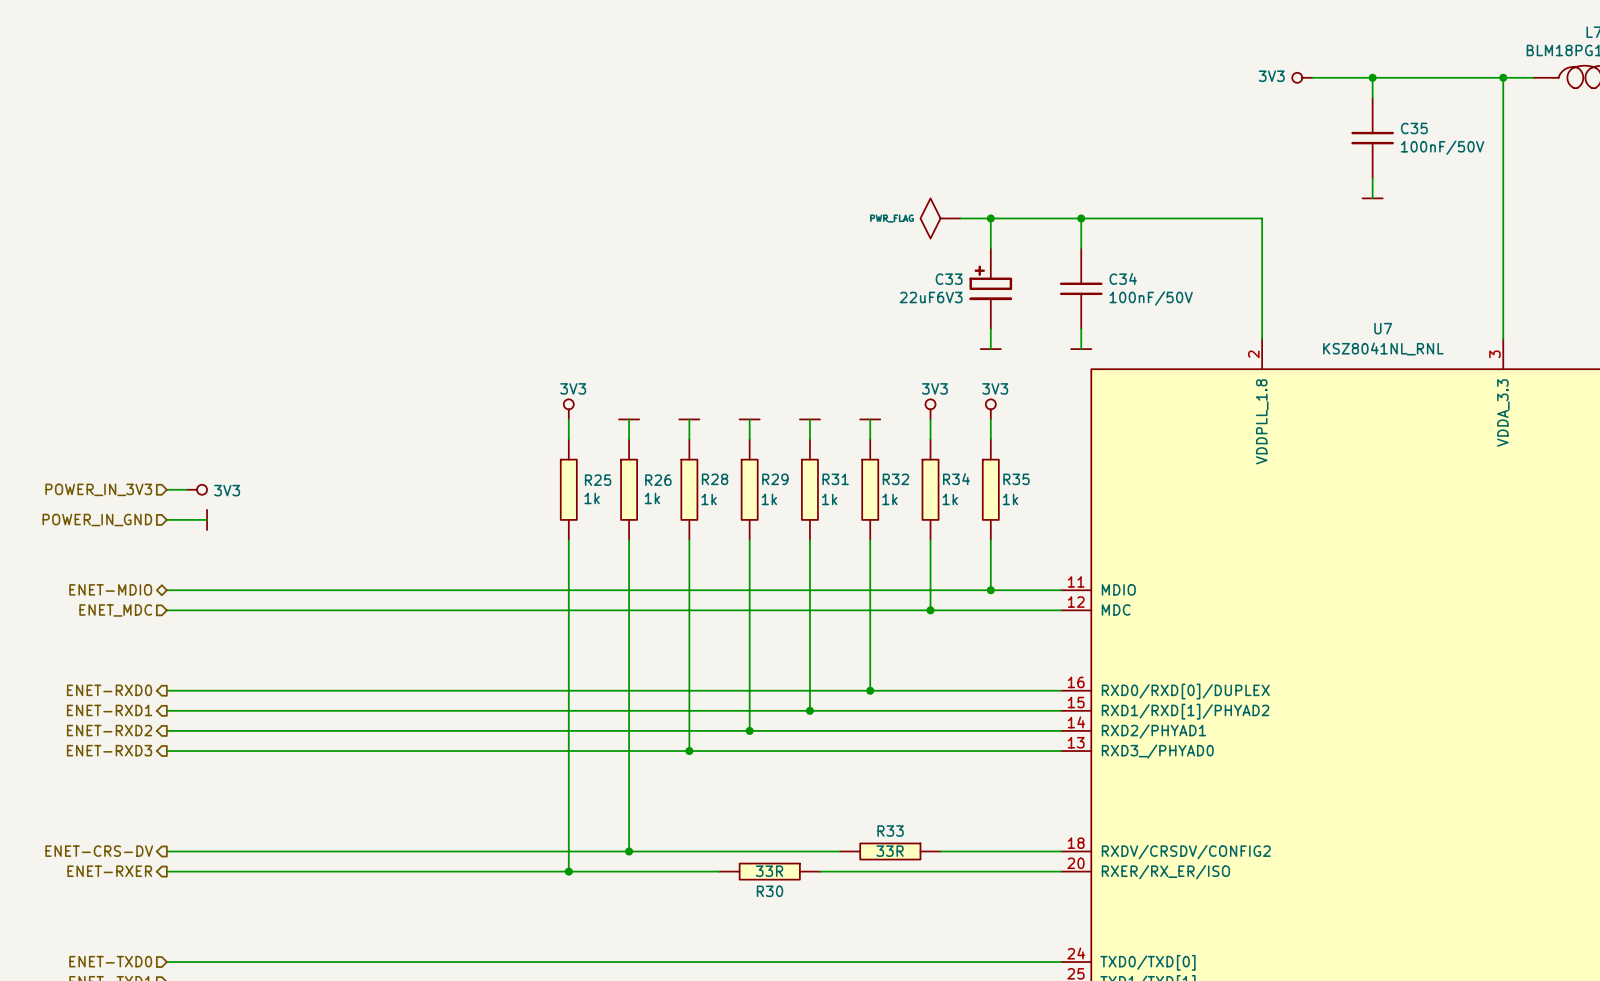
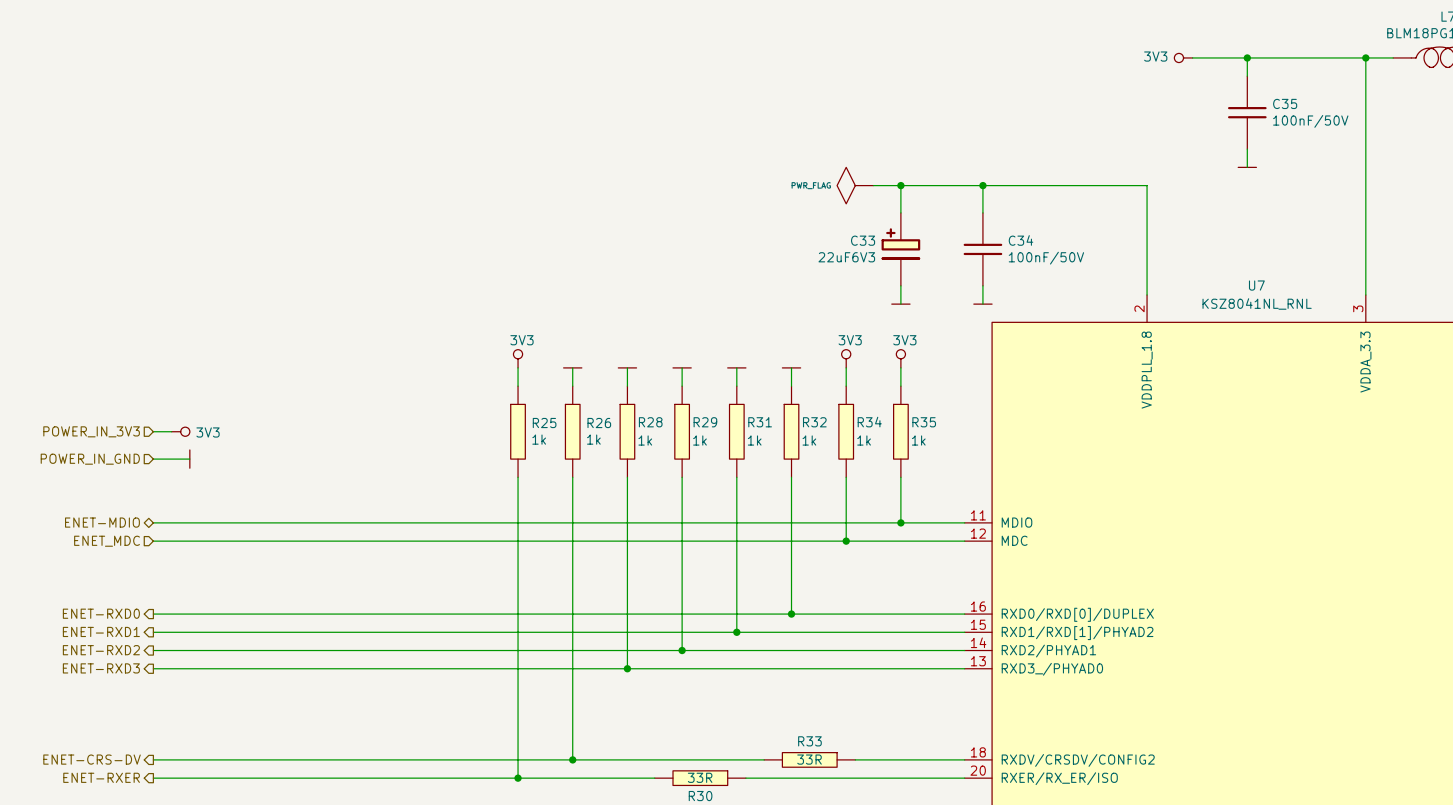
C33 symbol: [969, 248, 1013, 330] -> [881, 212, 921, 286]

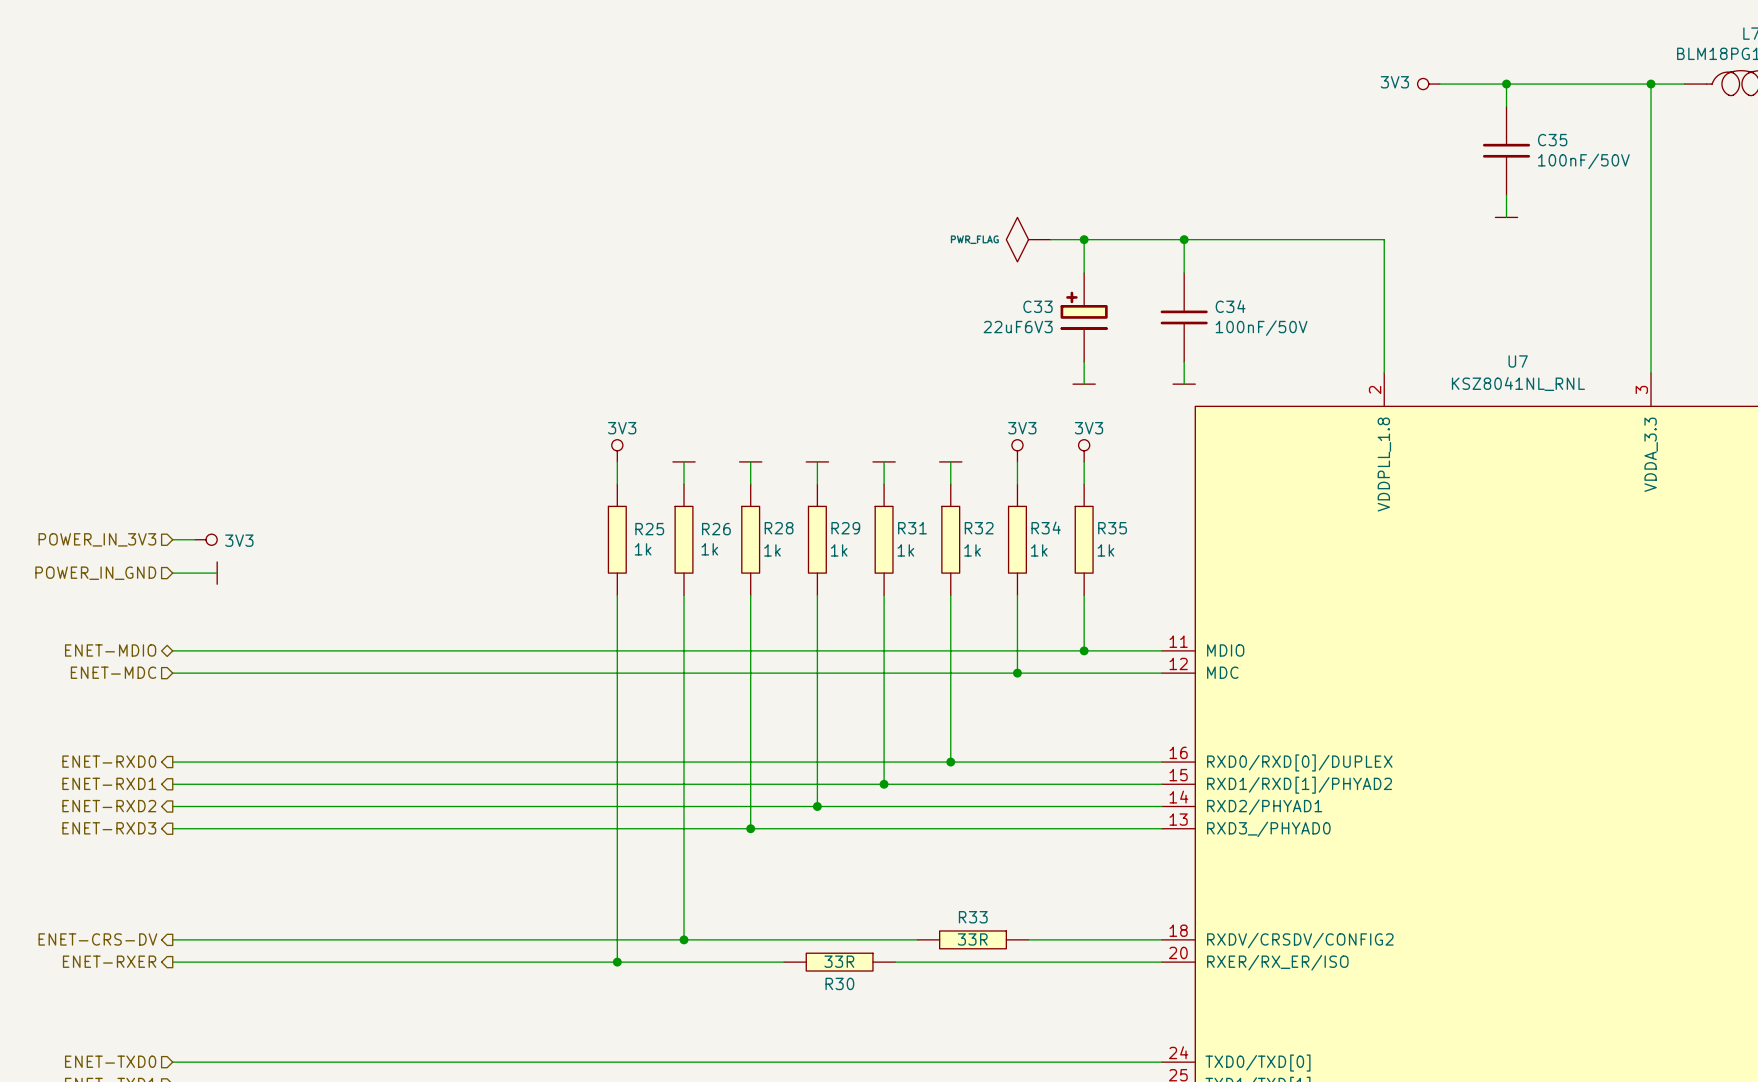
hierarchical label: ENET_MDC (107, 541) -> ENET-MDC (113, 672)

